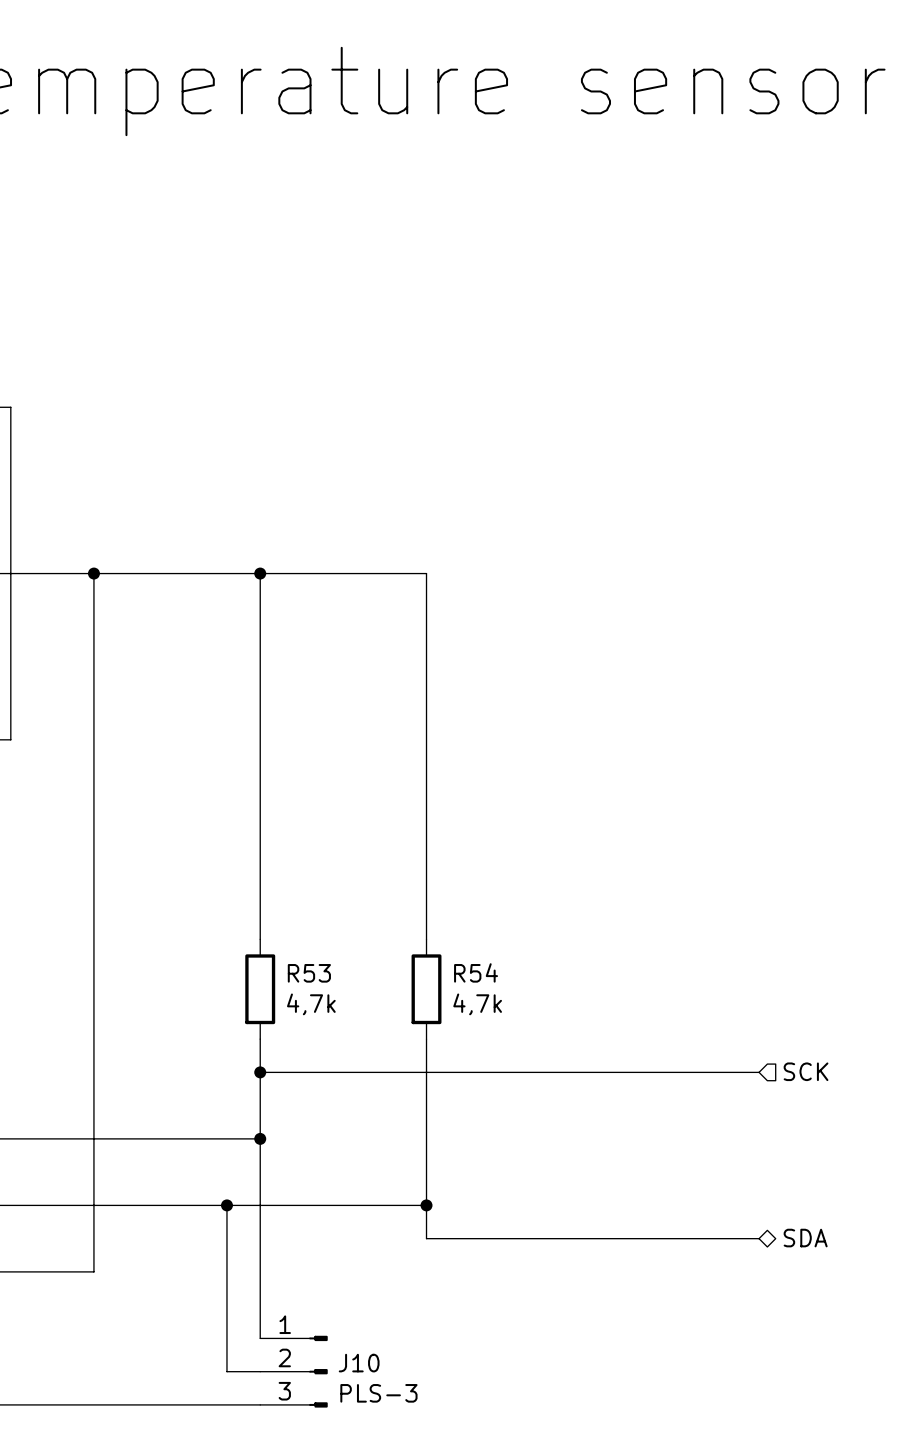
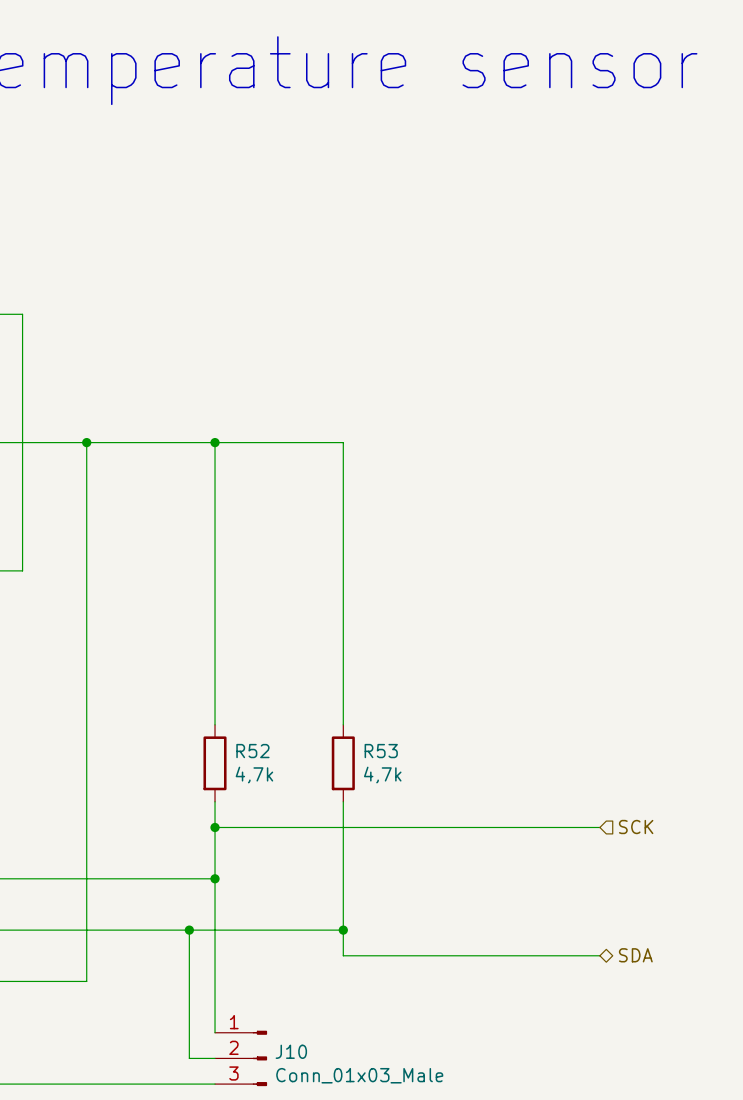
R54 name: R54 (476, 972) -> R53 (381, 751)
R53 name: R53 (309, 973) -> R52 (252, 751)
J10 value: PLS-3 (378, 1393) -> Conn_01x03_Male (359, 1075)

